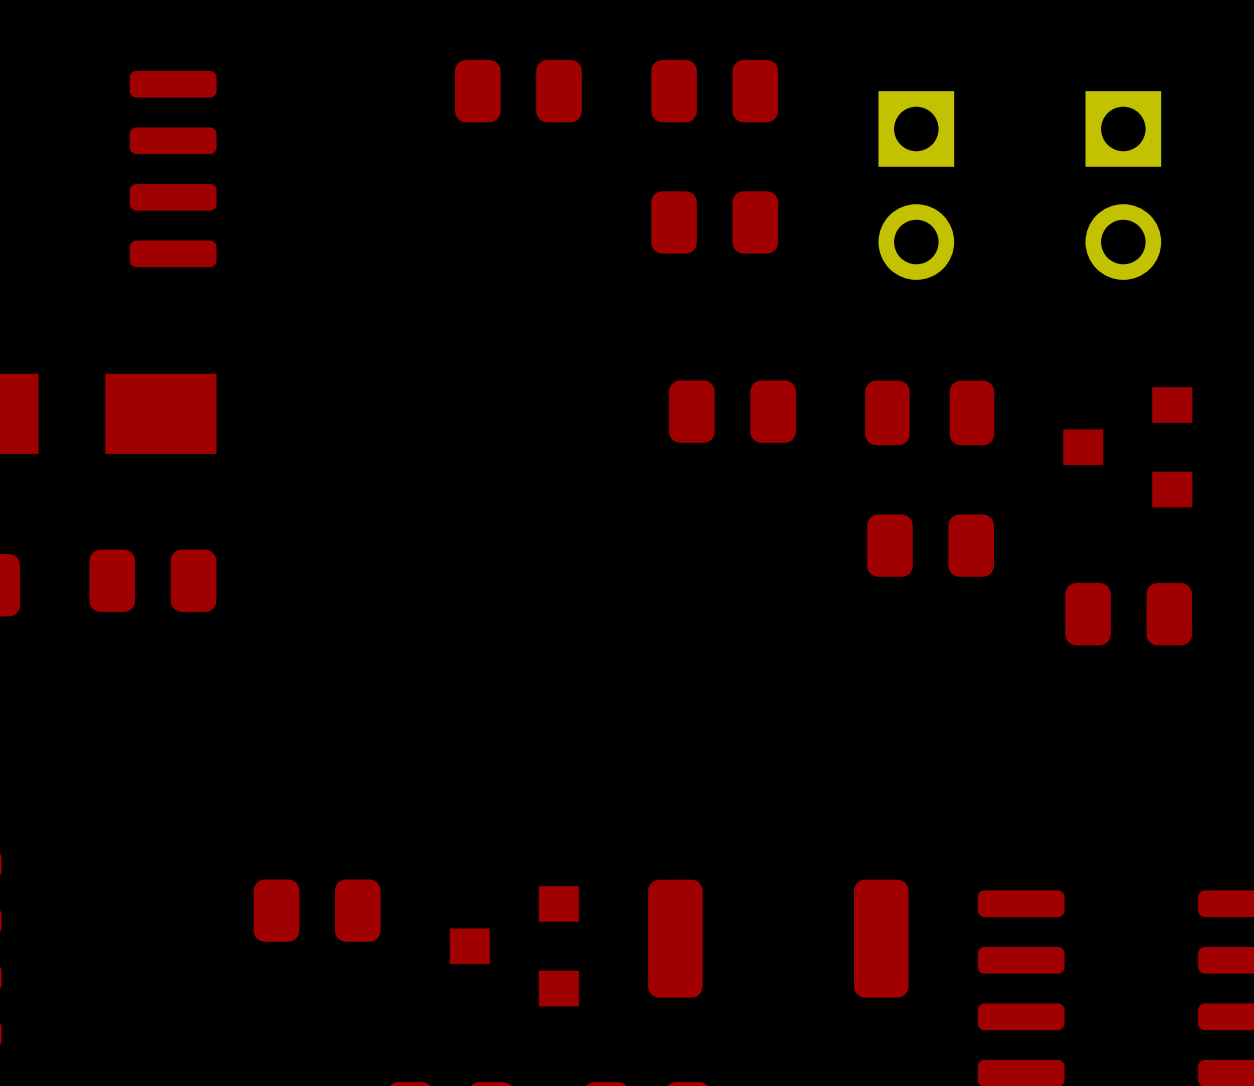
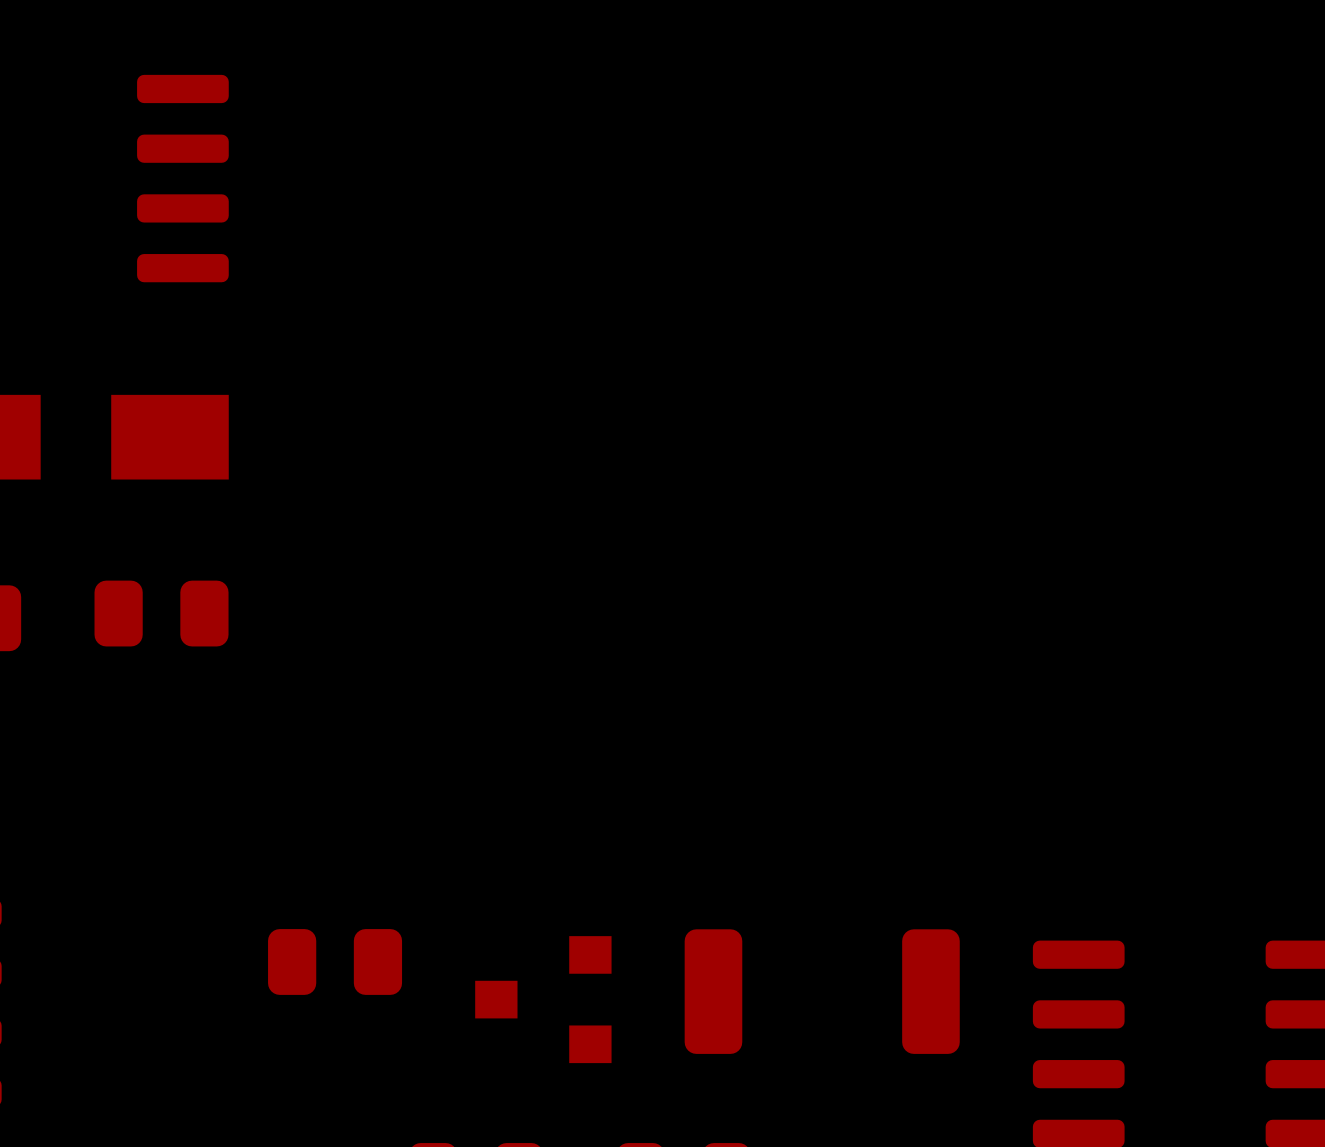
part: (518, 91) -> none
part: (714, 91) -> none
part: (916, 185) -> none
part: (1123, 185) -> none
part: (714, 222) -> none
part: (732, 411) -> none
part: (929, 412) -> none
part: (1127, 447) -> none
part: (930, 545) -> none
part: (1128, 614) -> none

